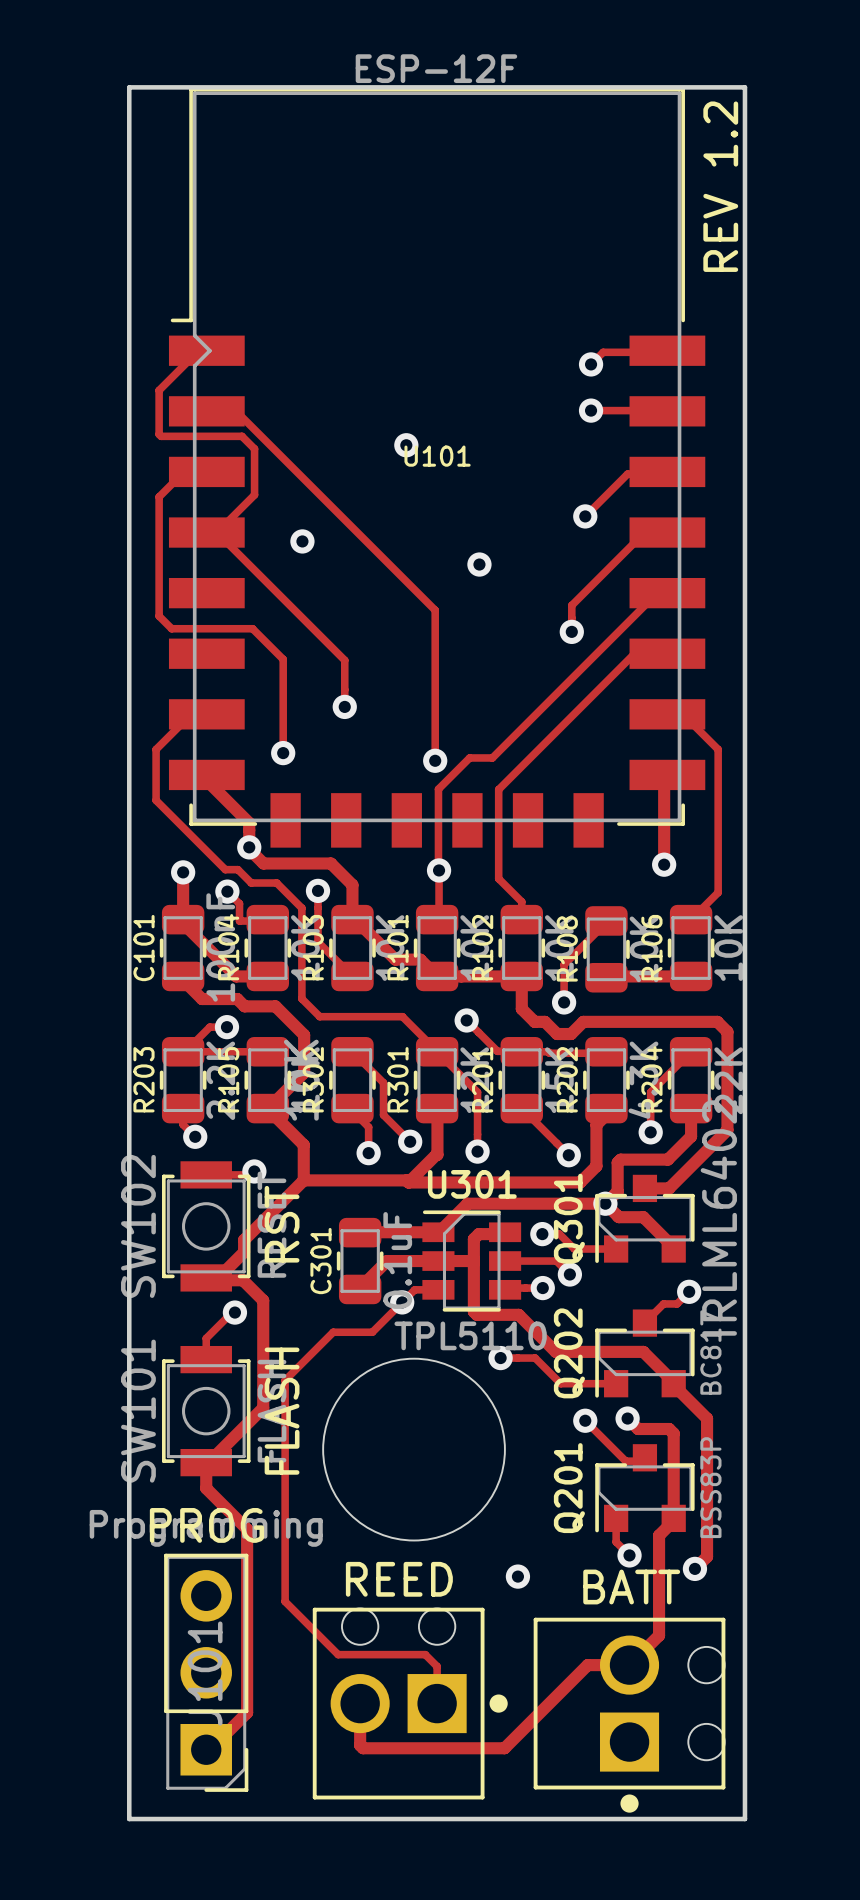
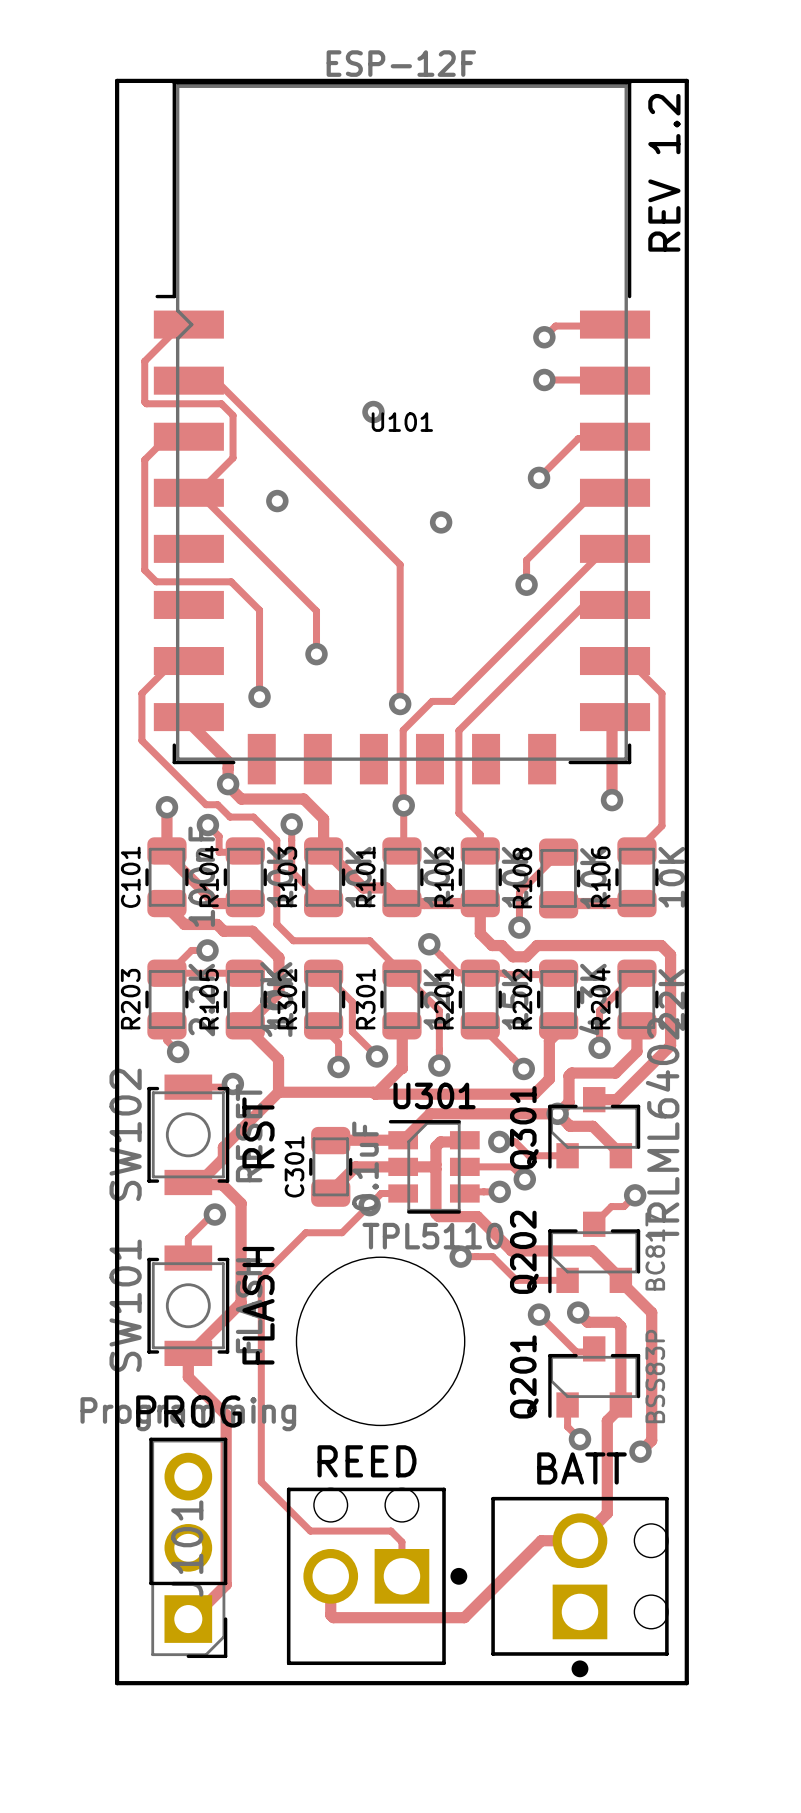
via: (517, 1576) -> none

